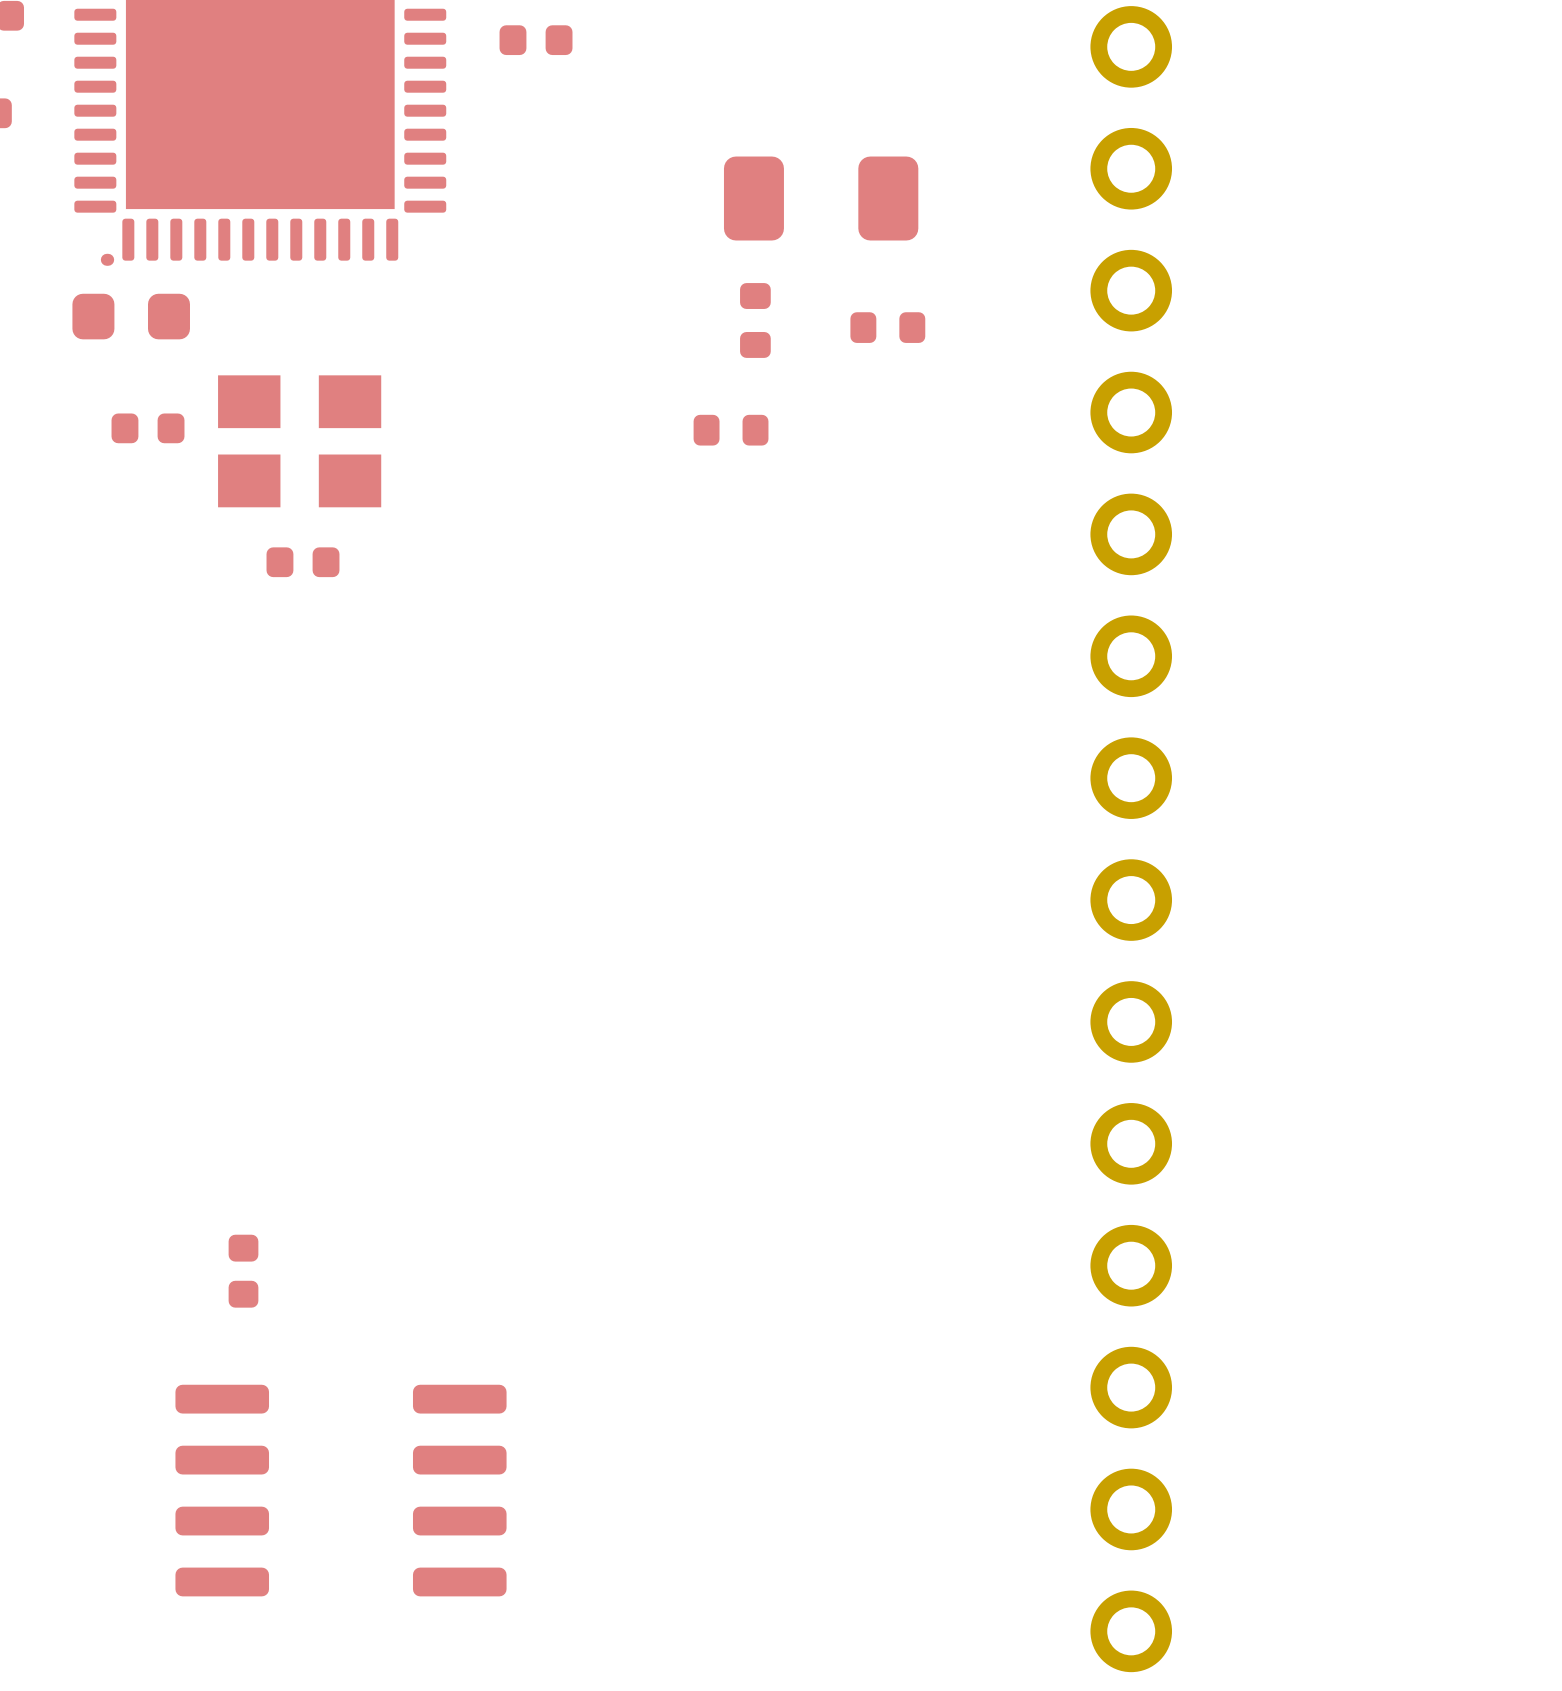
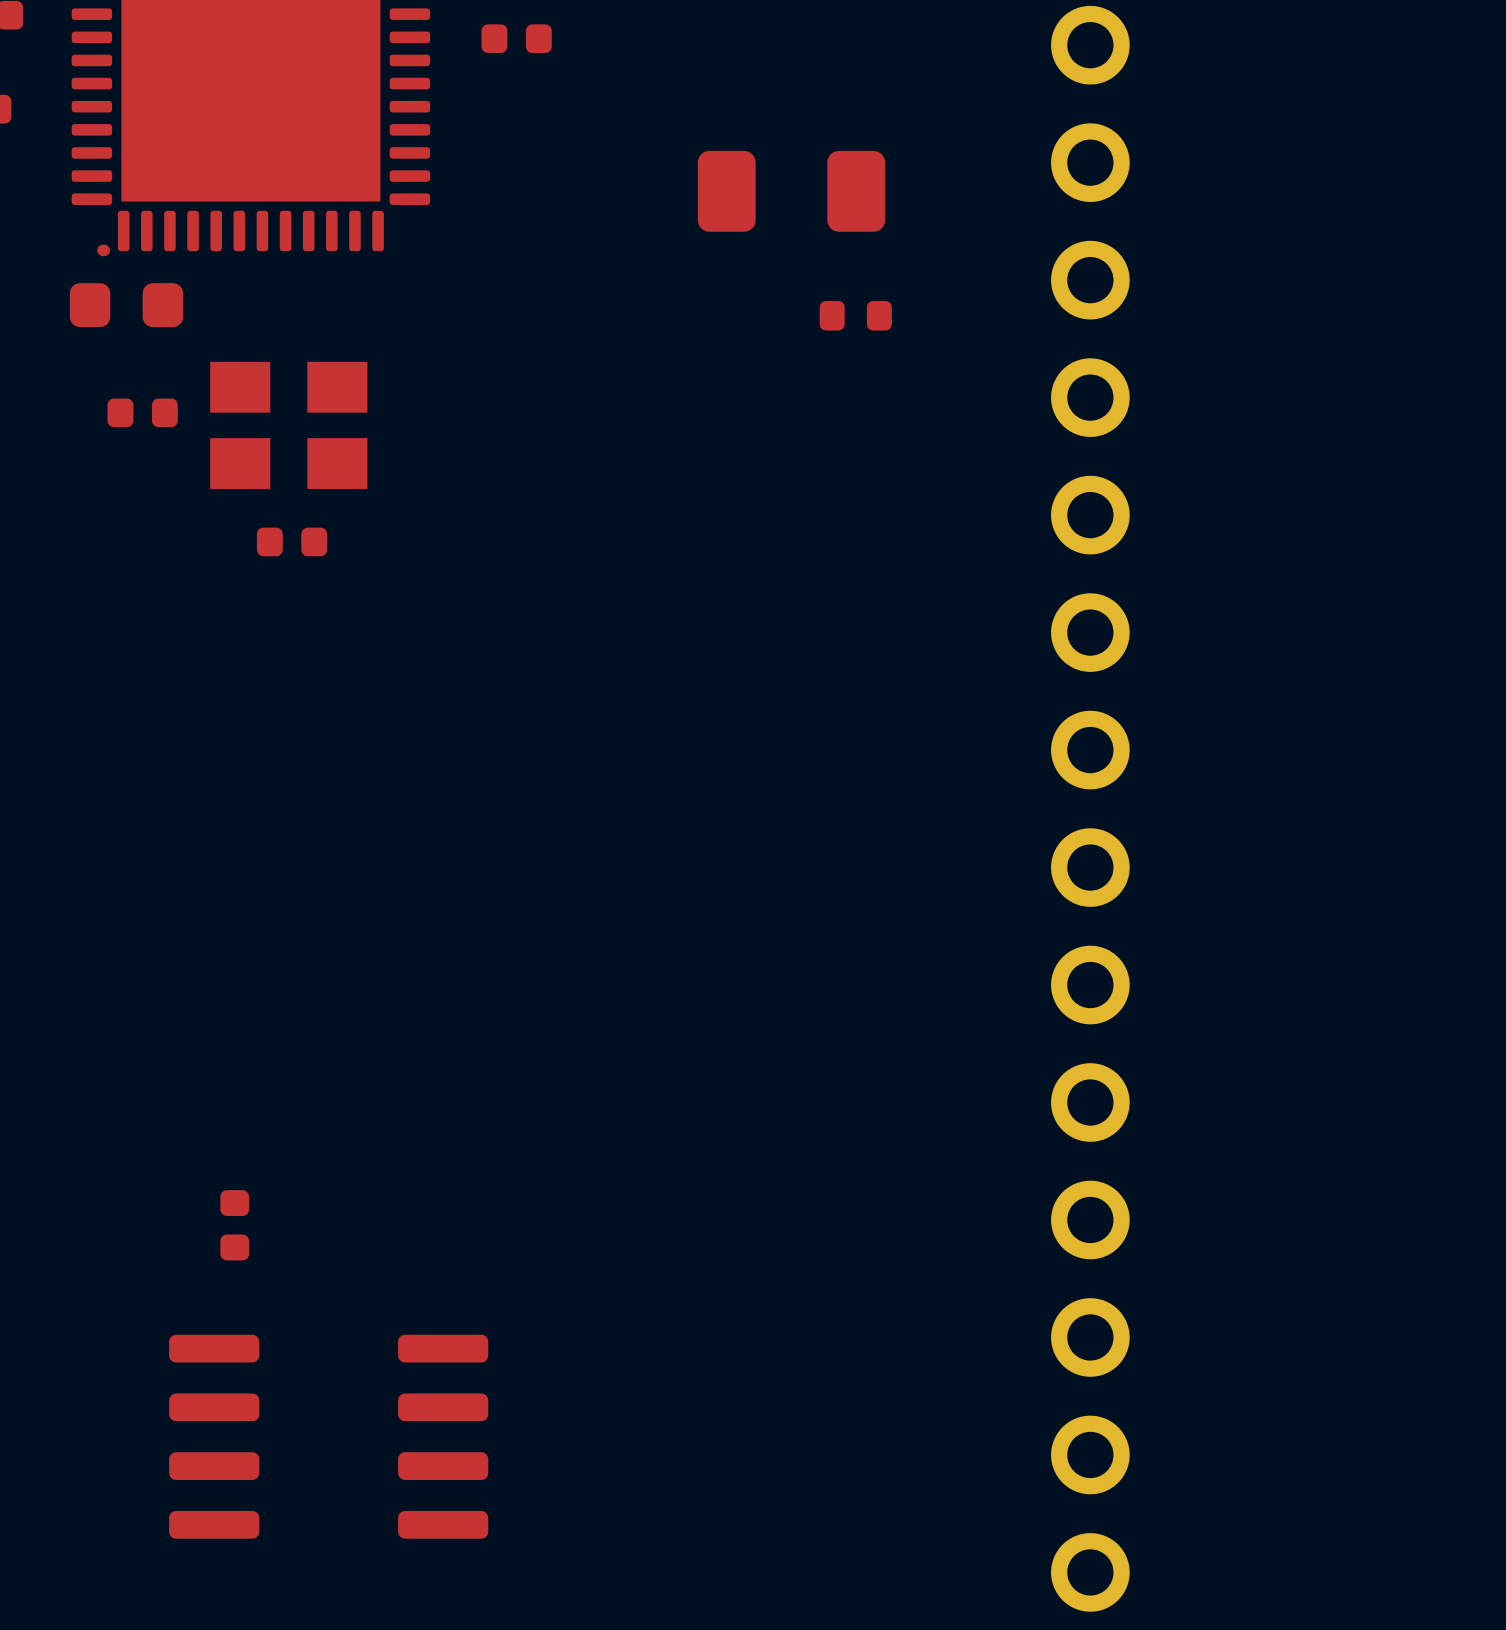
part: (755, 320) -> none
part: (731, 430) -> none

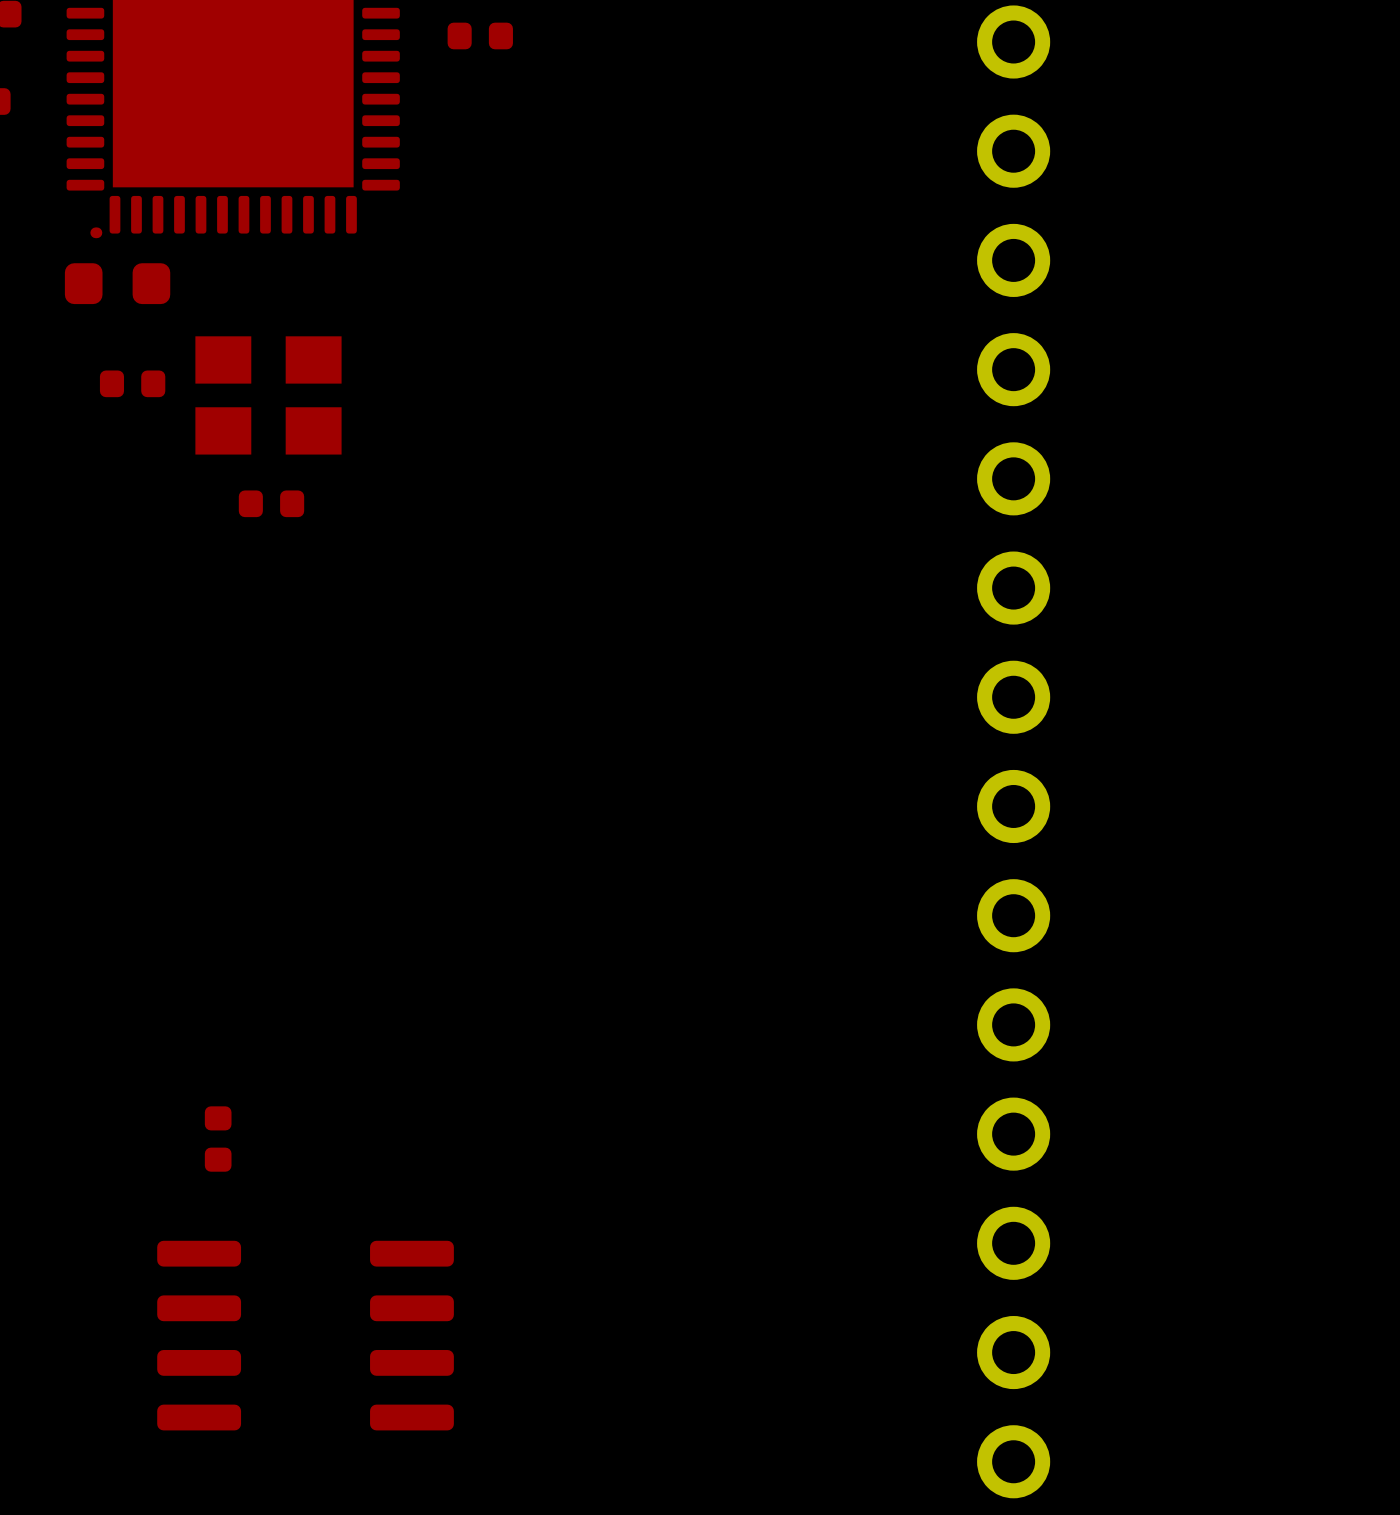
part: (791, 191) -> none
part: (855, 315) -> none

